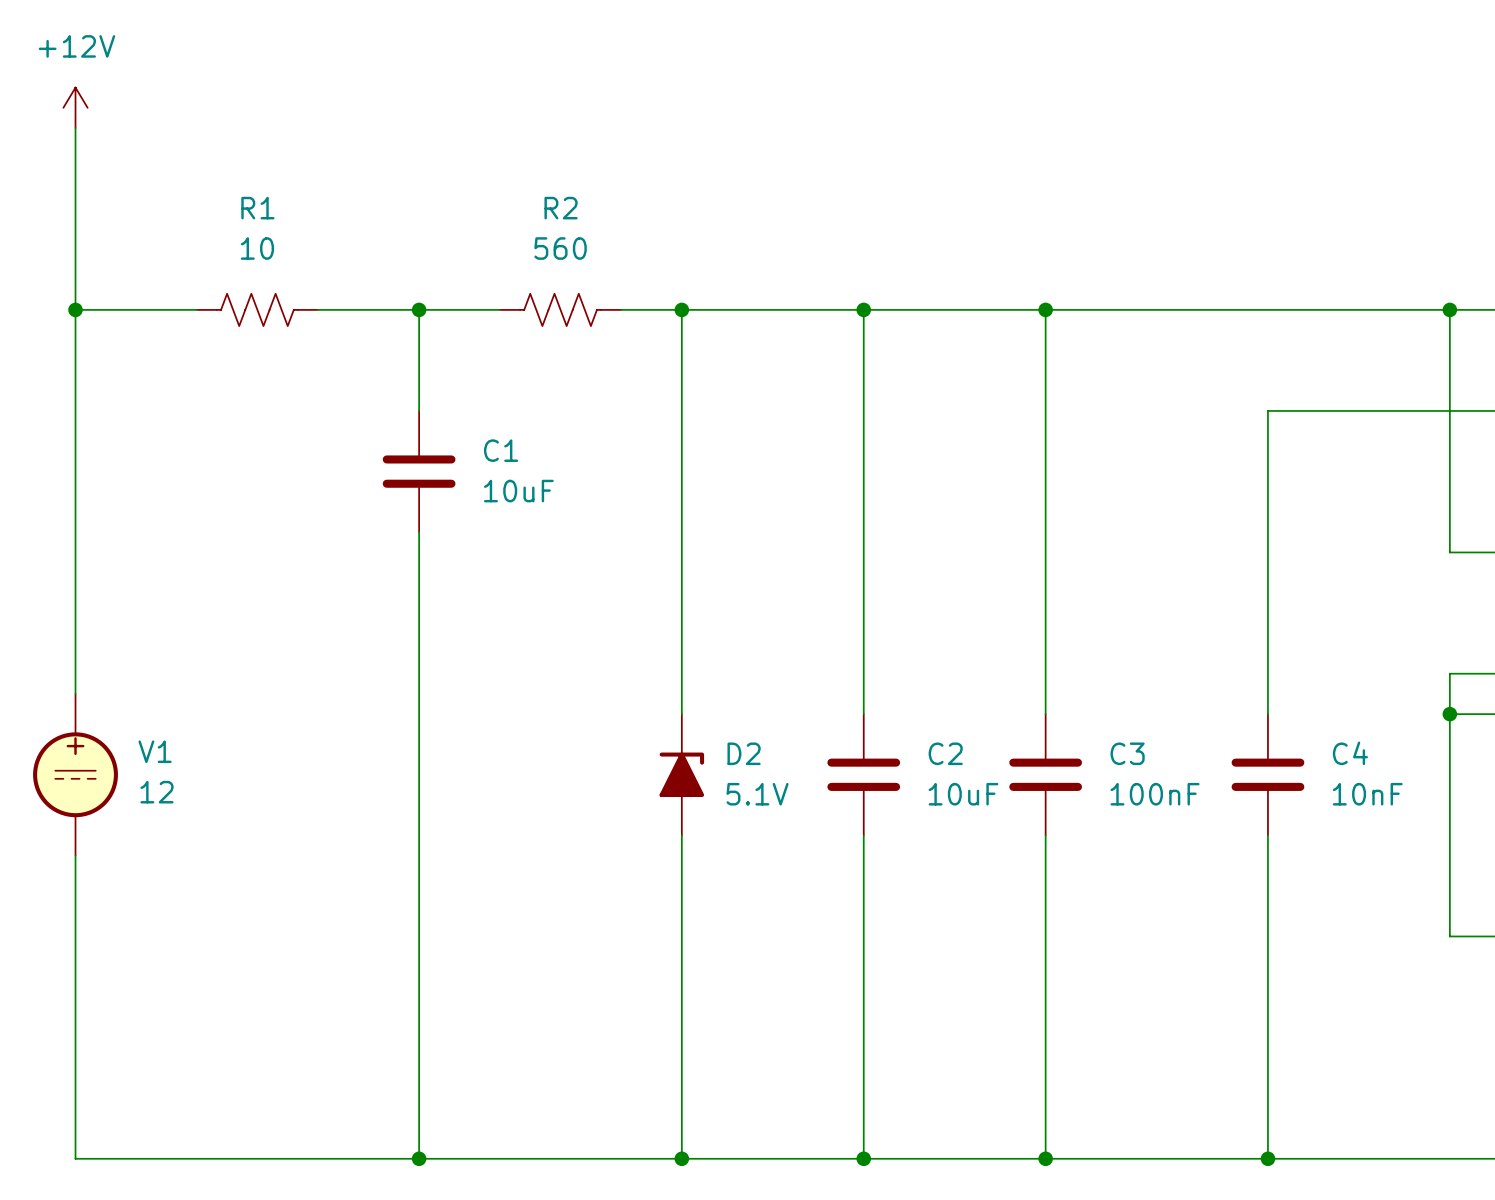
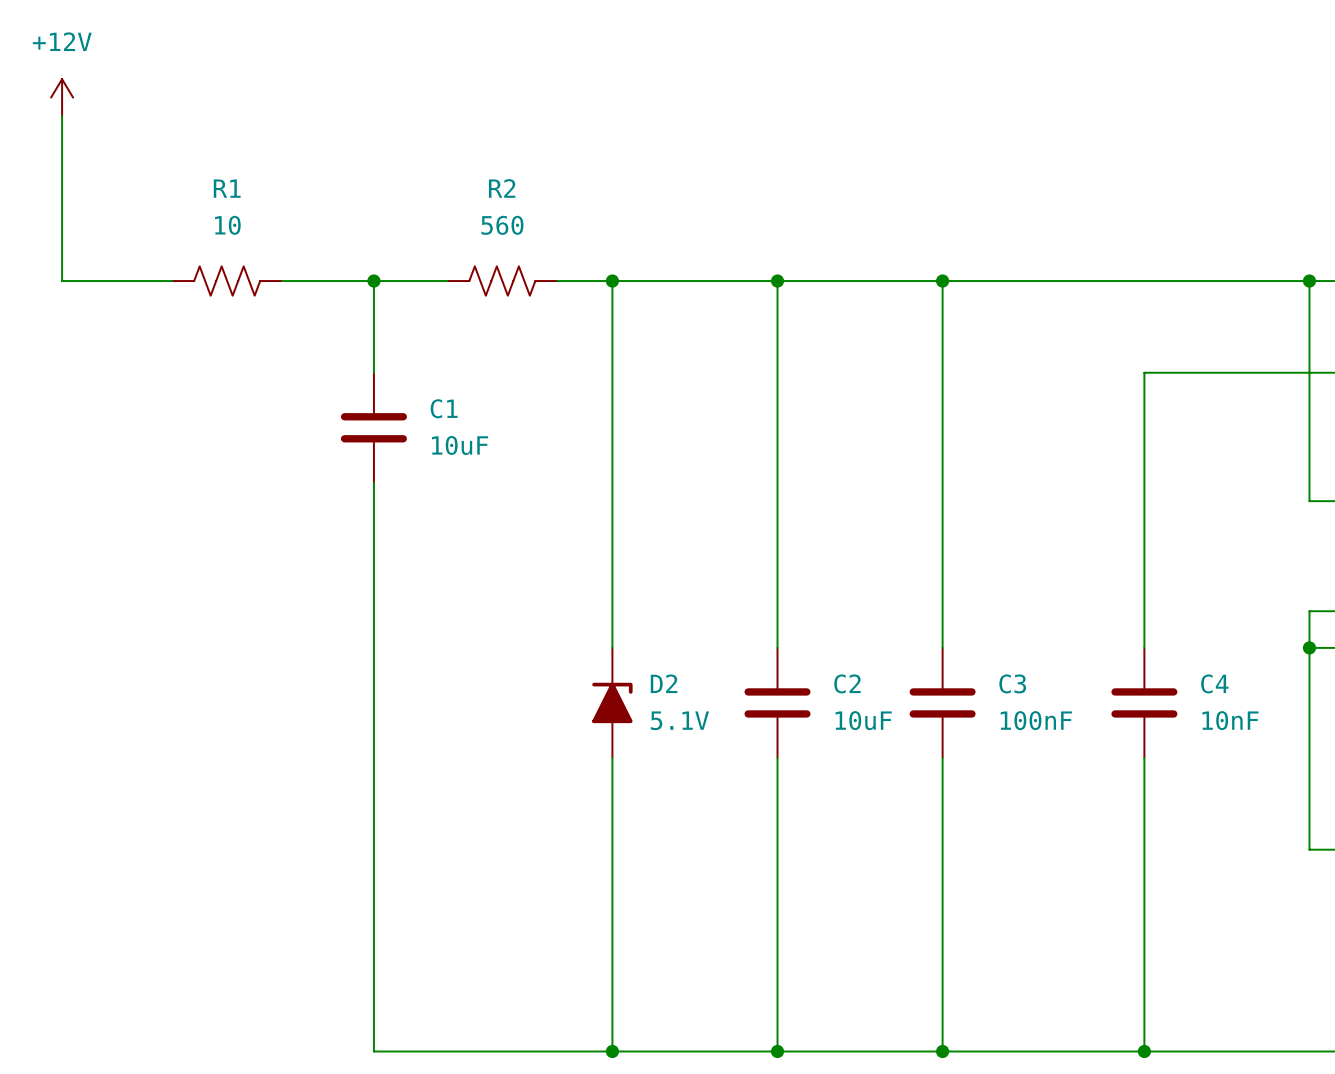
wire: (75, 309) (75, 693) -> none
junction: (75, 309) -> none
V1: 12 (75, 774) -> none
wire: (75, 855) (75, 1158) (419, 1158) -> none
junction: (419, 1158) -> none

